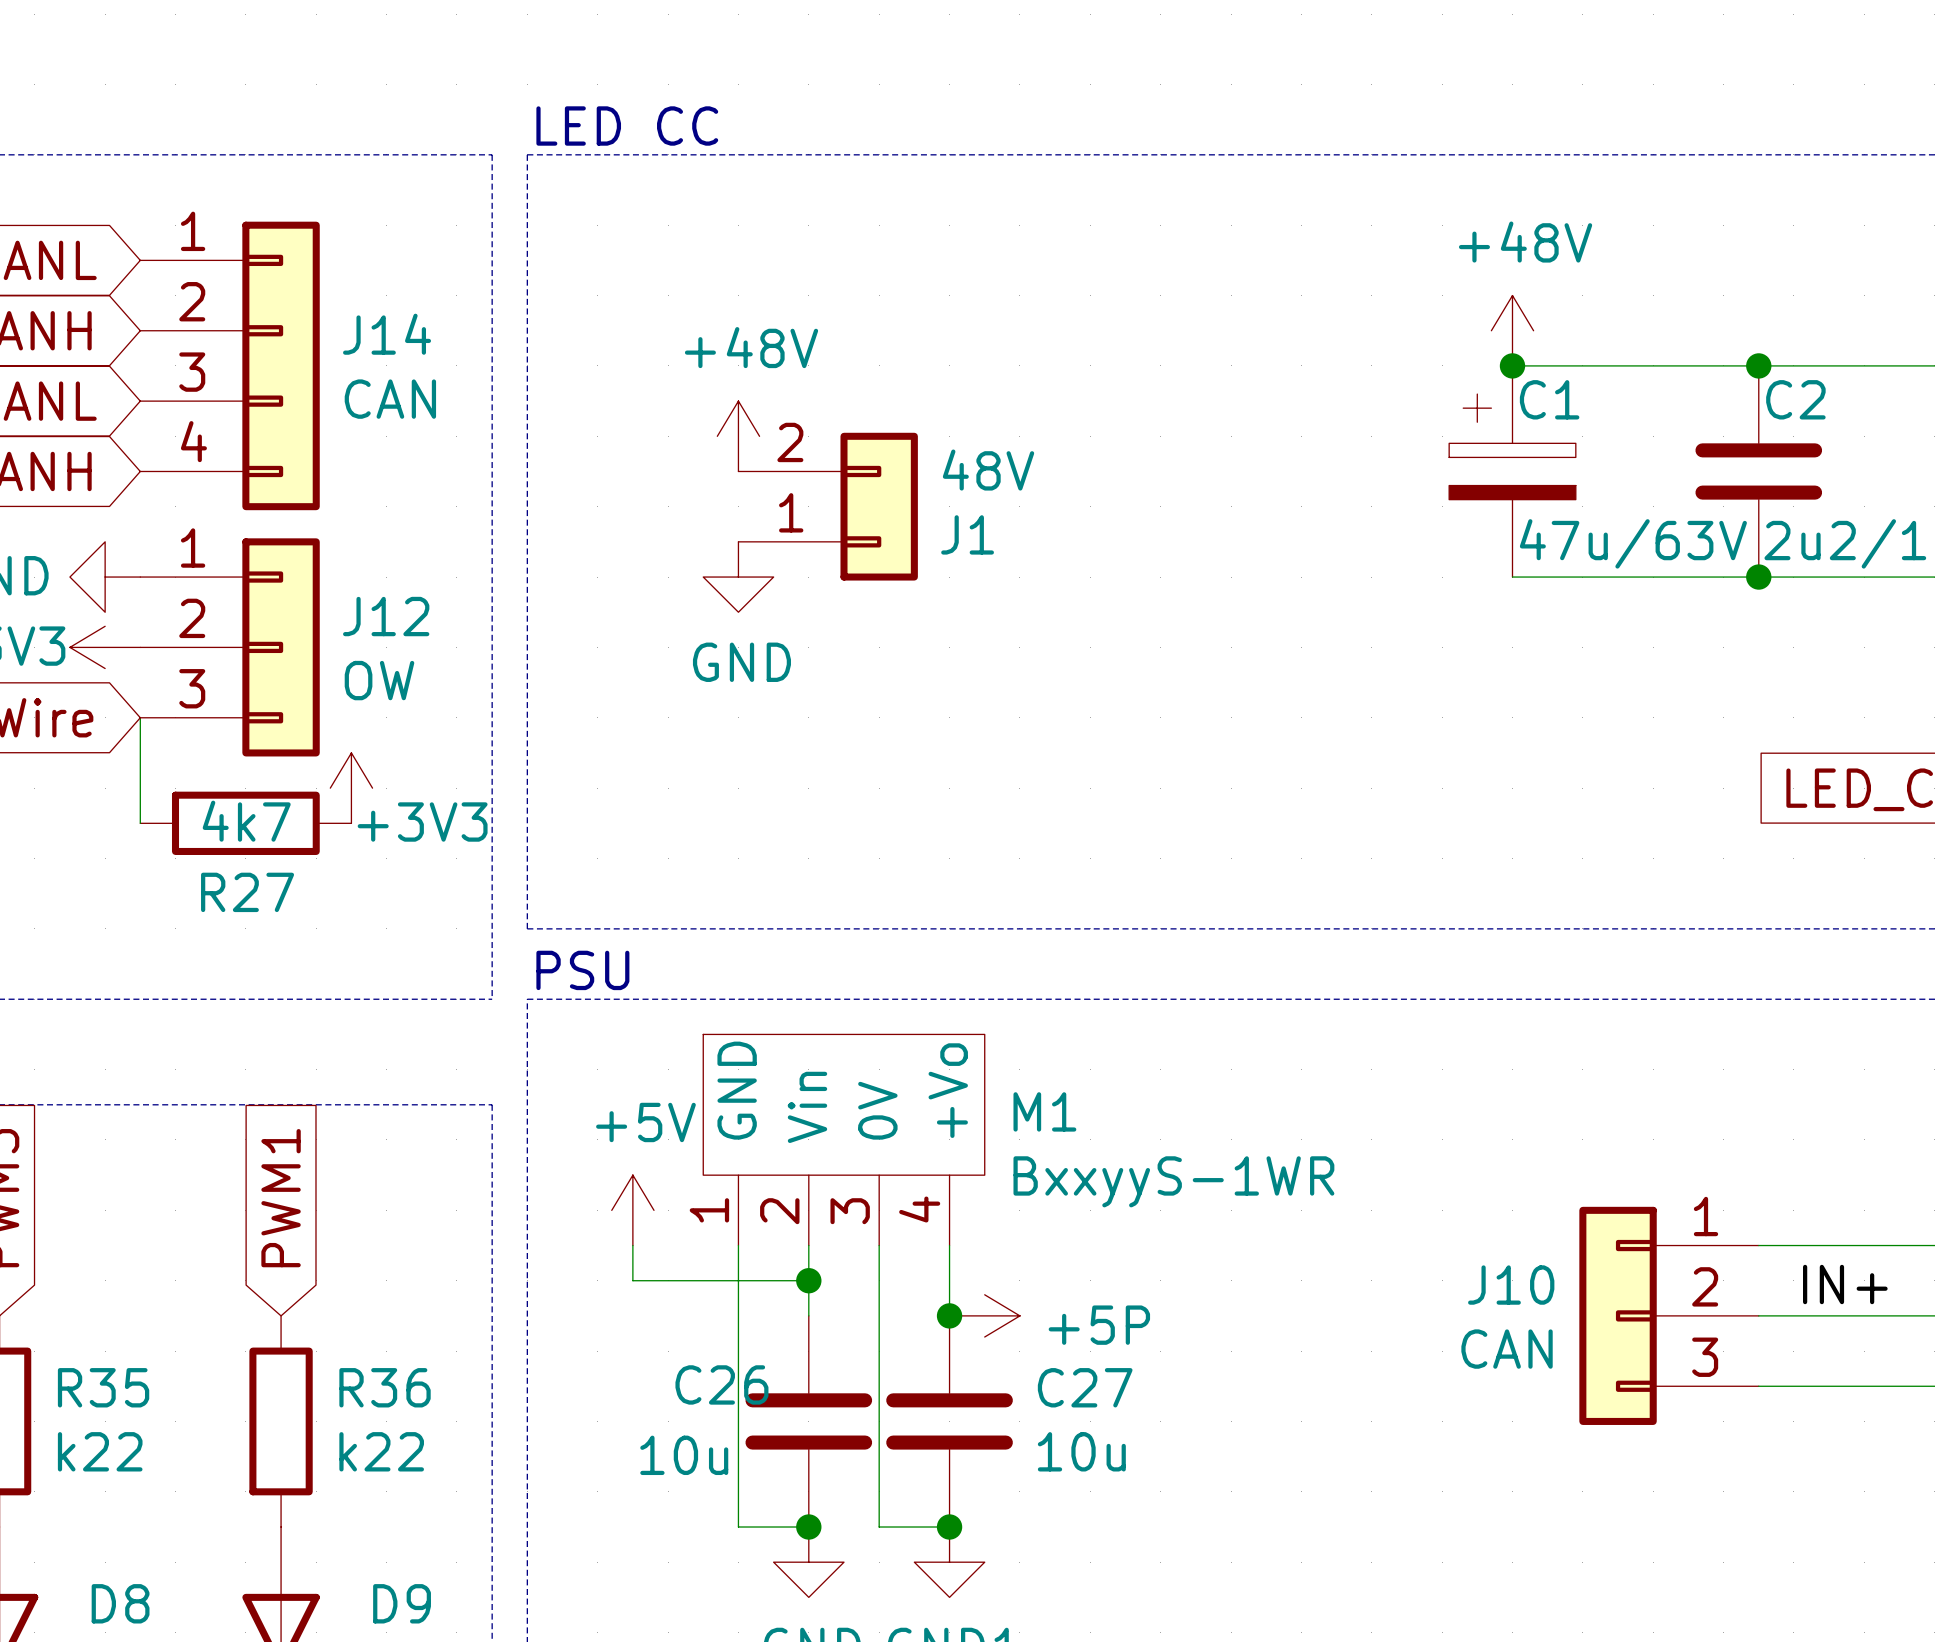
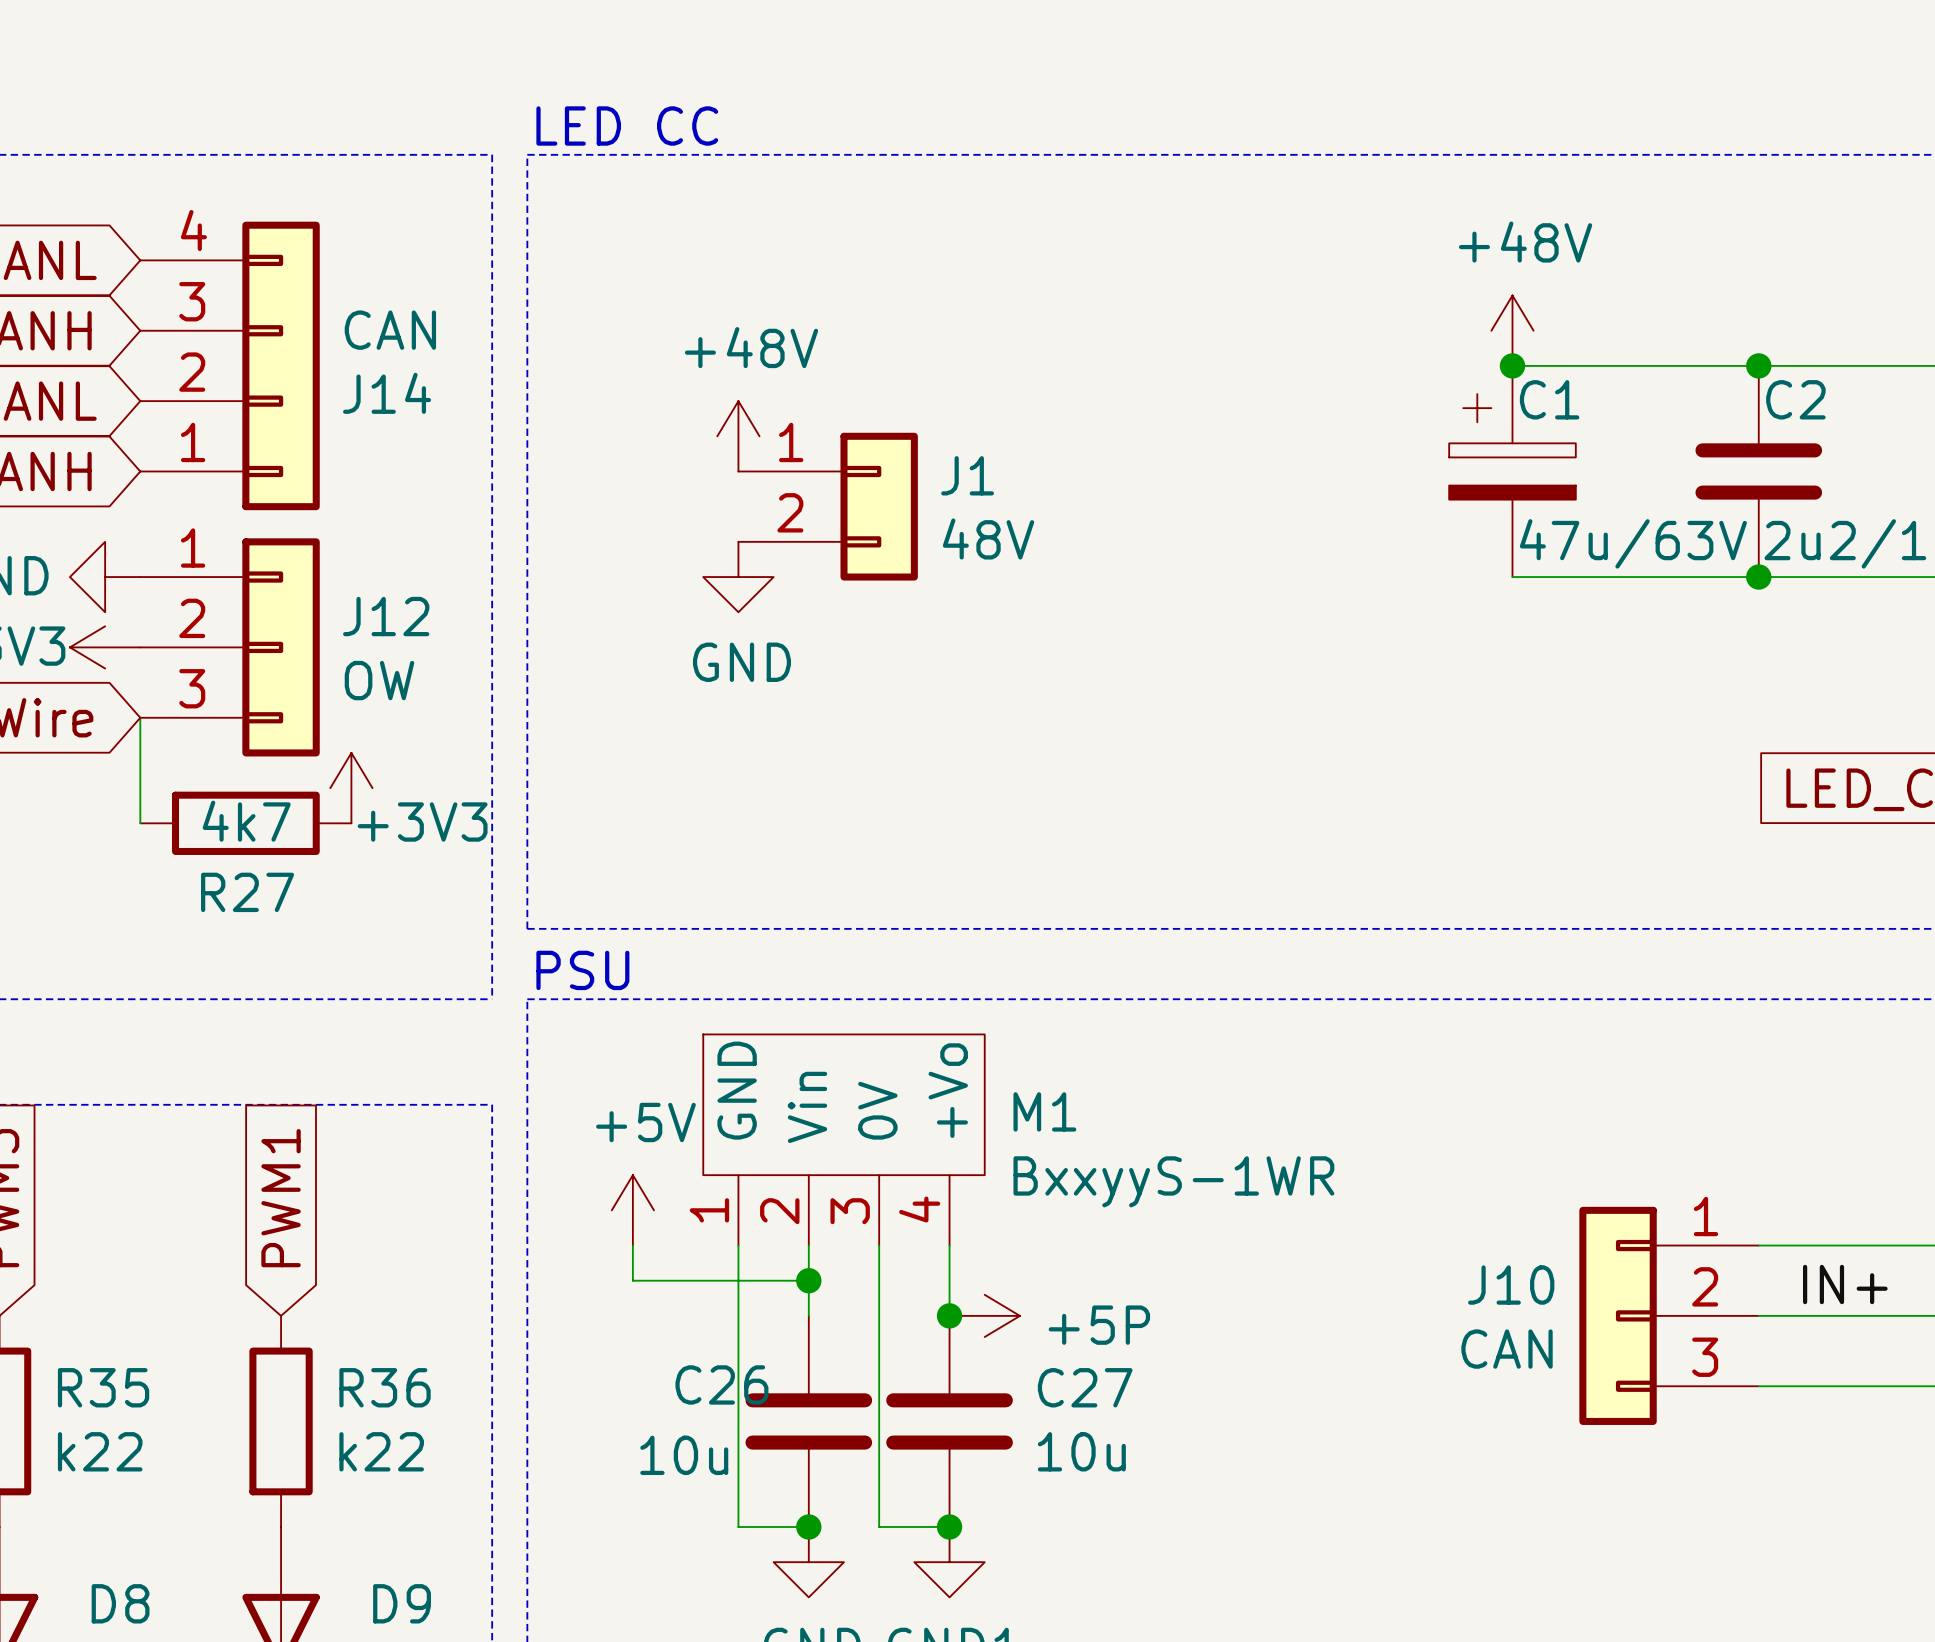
J14 flip: as is (281, 365) -> up-down (281, 365)
J1 flip: as is (879, 506) -> up-down (879, 506)

